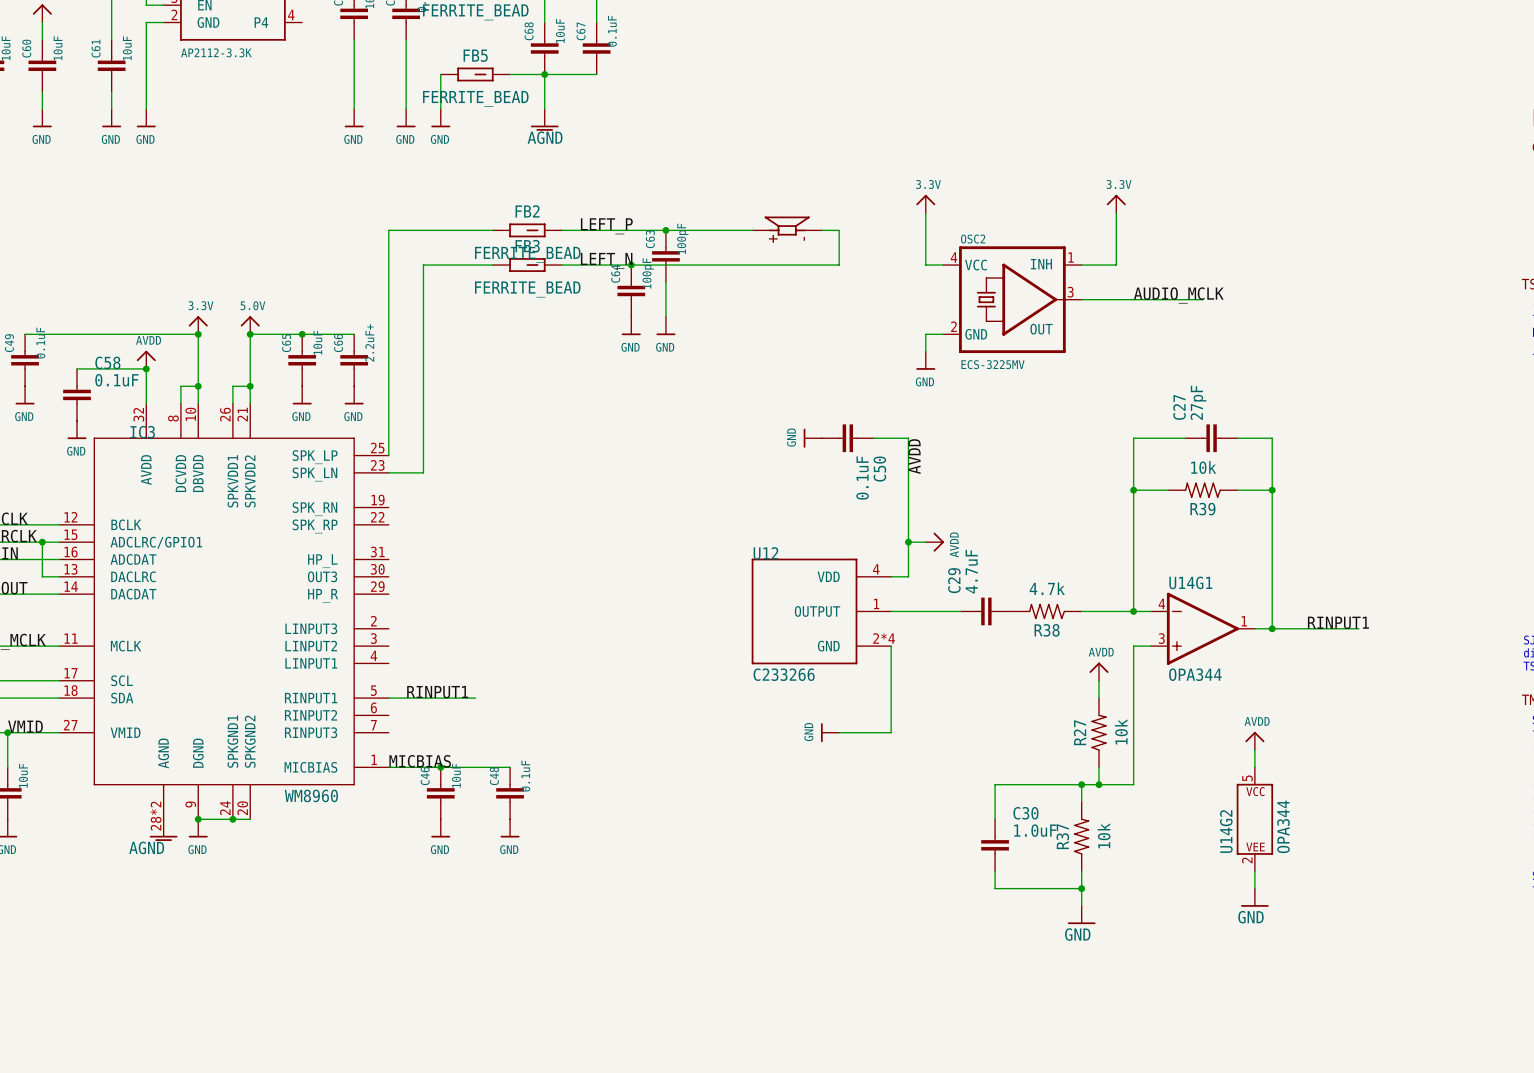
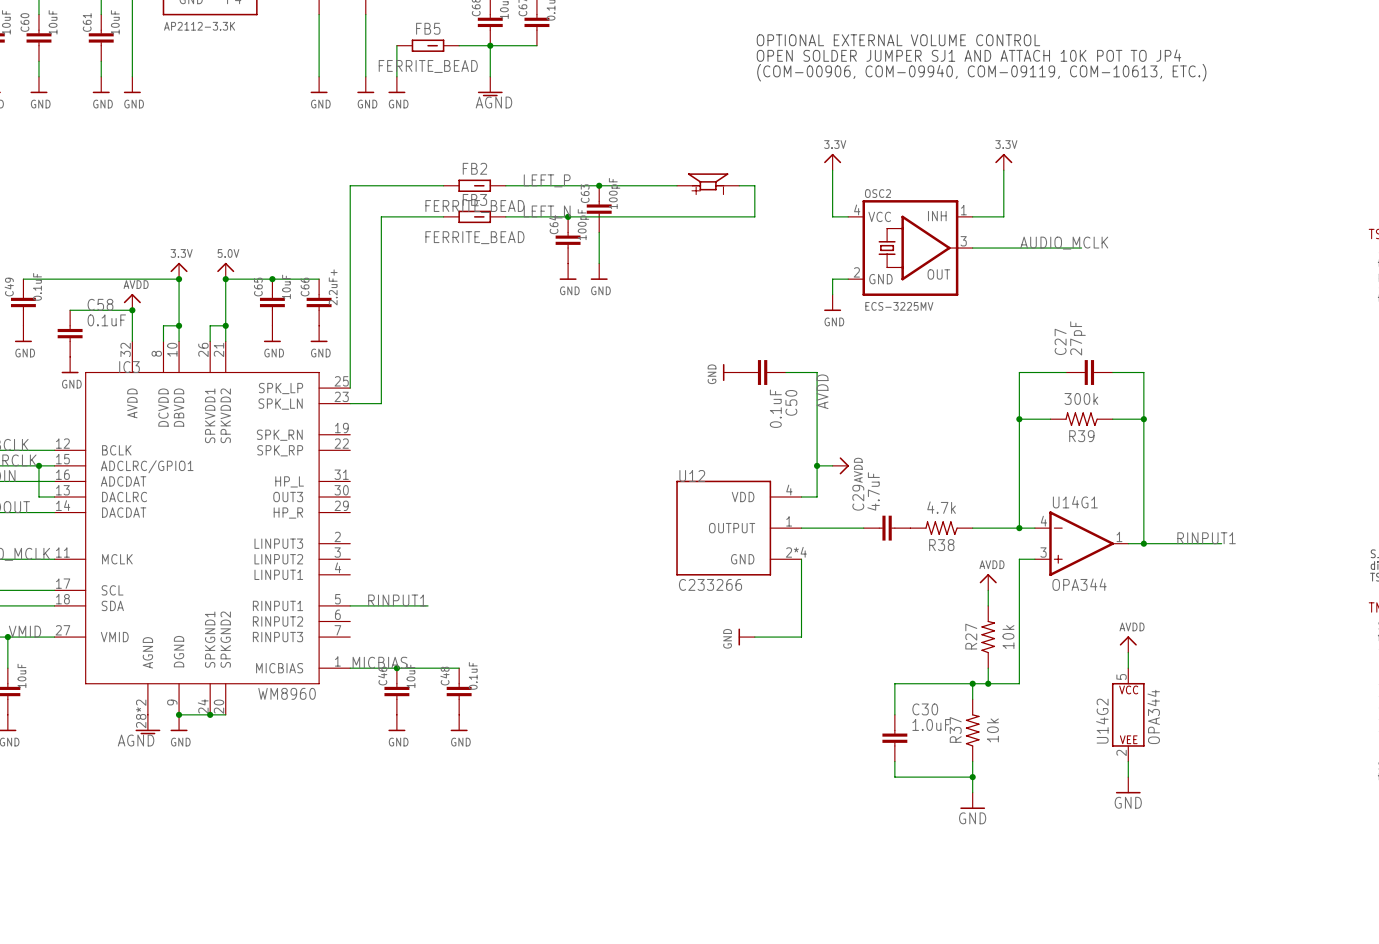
text: none -> OPTIONAL EXTERNAL VOLUME CONTROL (898, 40)
text: none -> OPEN SOLDER JUMPER SJ1 AND ATTACH 10K POT TO JP4 (968, 55)
text: none -> (COM-00906, COM-09940, COM-09119, COM-10613, ETC.) (981, 72)
R39 value: 10k (1203, 467) -> 300k (1081, 398)

